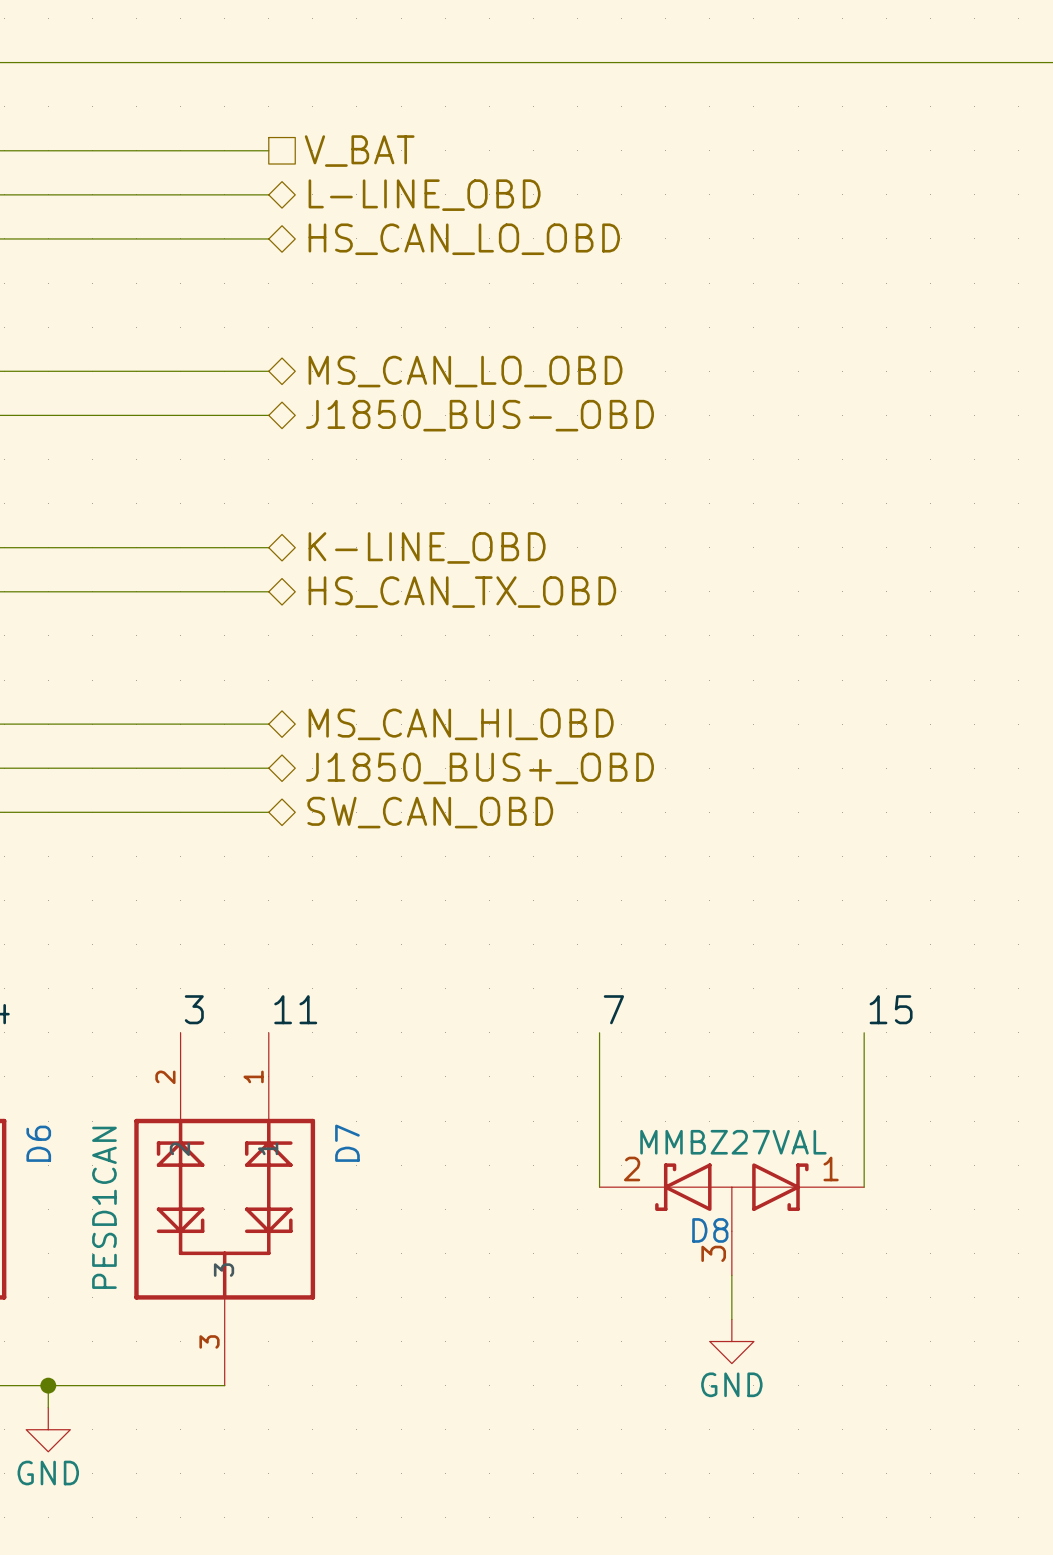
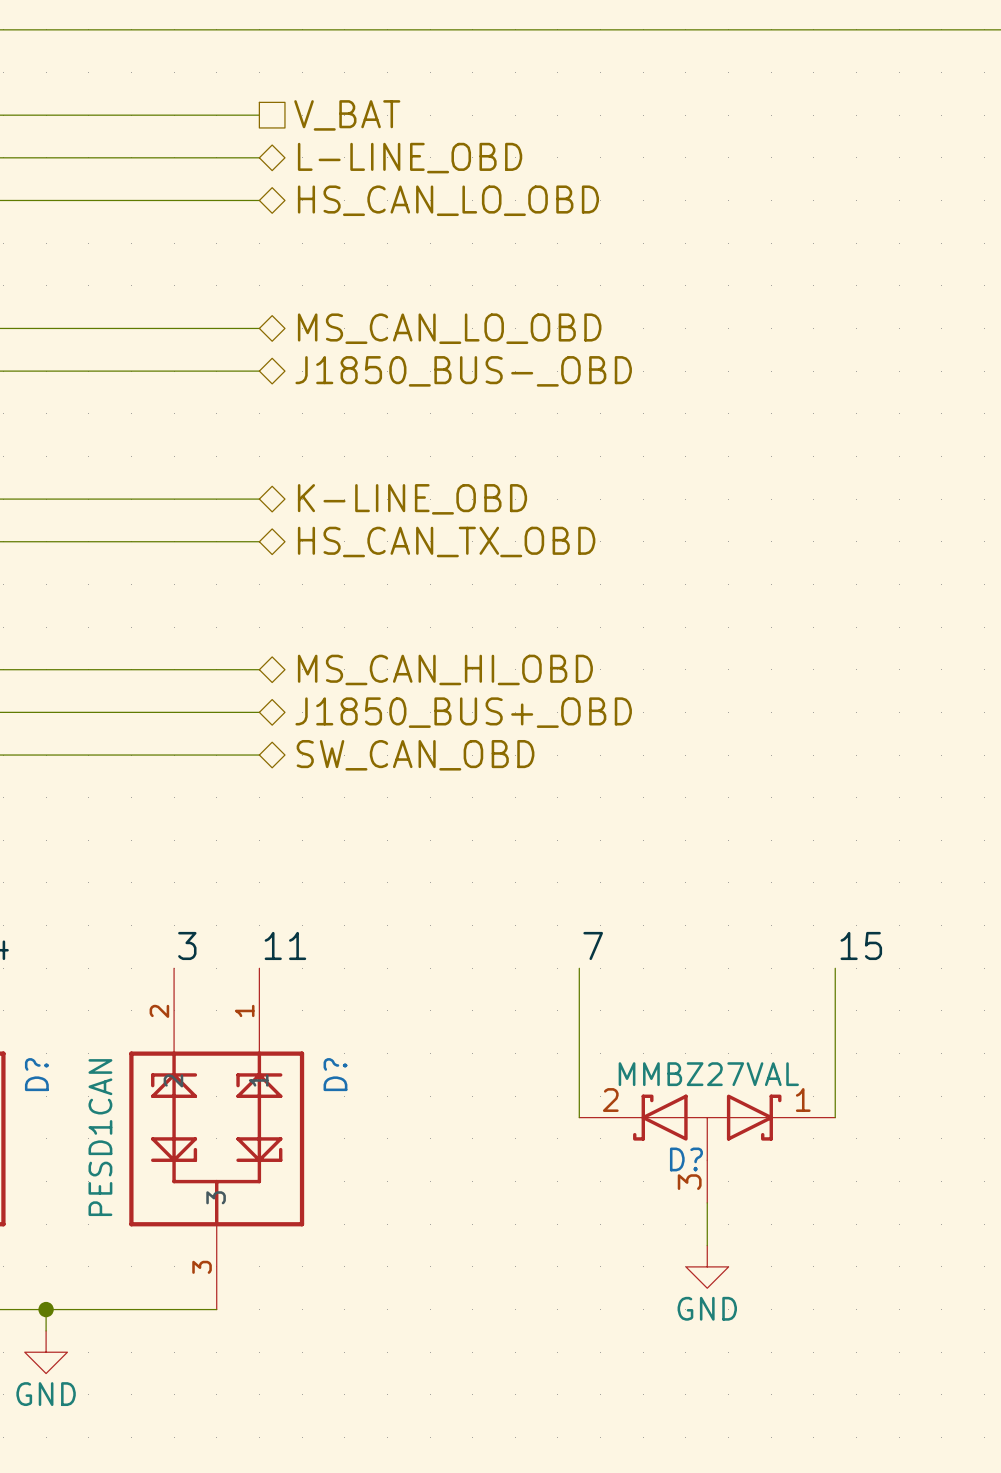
D6 name: D6 (38, 1143) -> D? (36, 1074)
D7 name: D7 (347, 1143) -> D? (335, 1074)
D8 name: D8 (710, 1230) -> D? (686, 1159)

